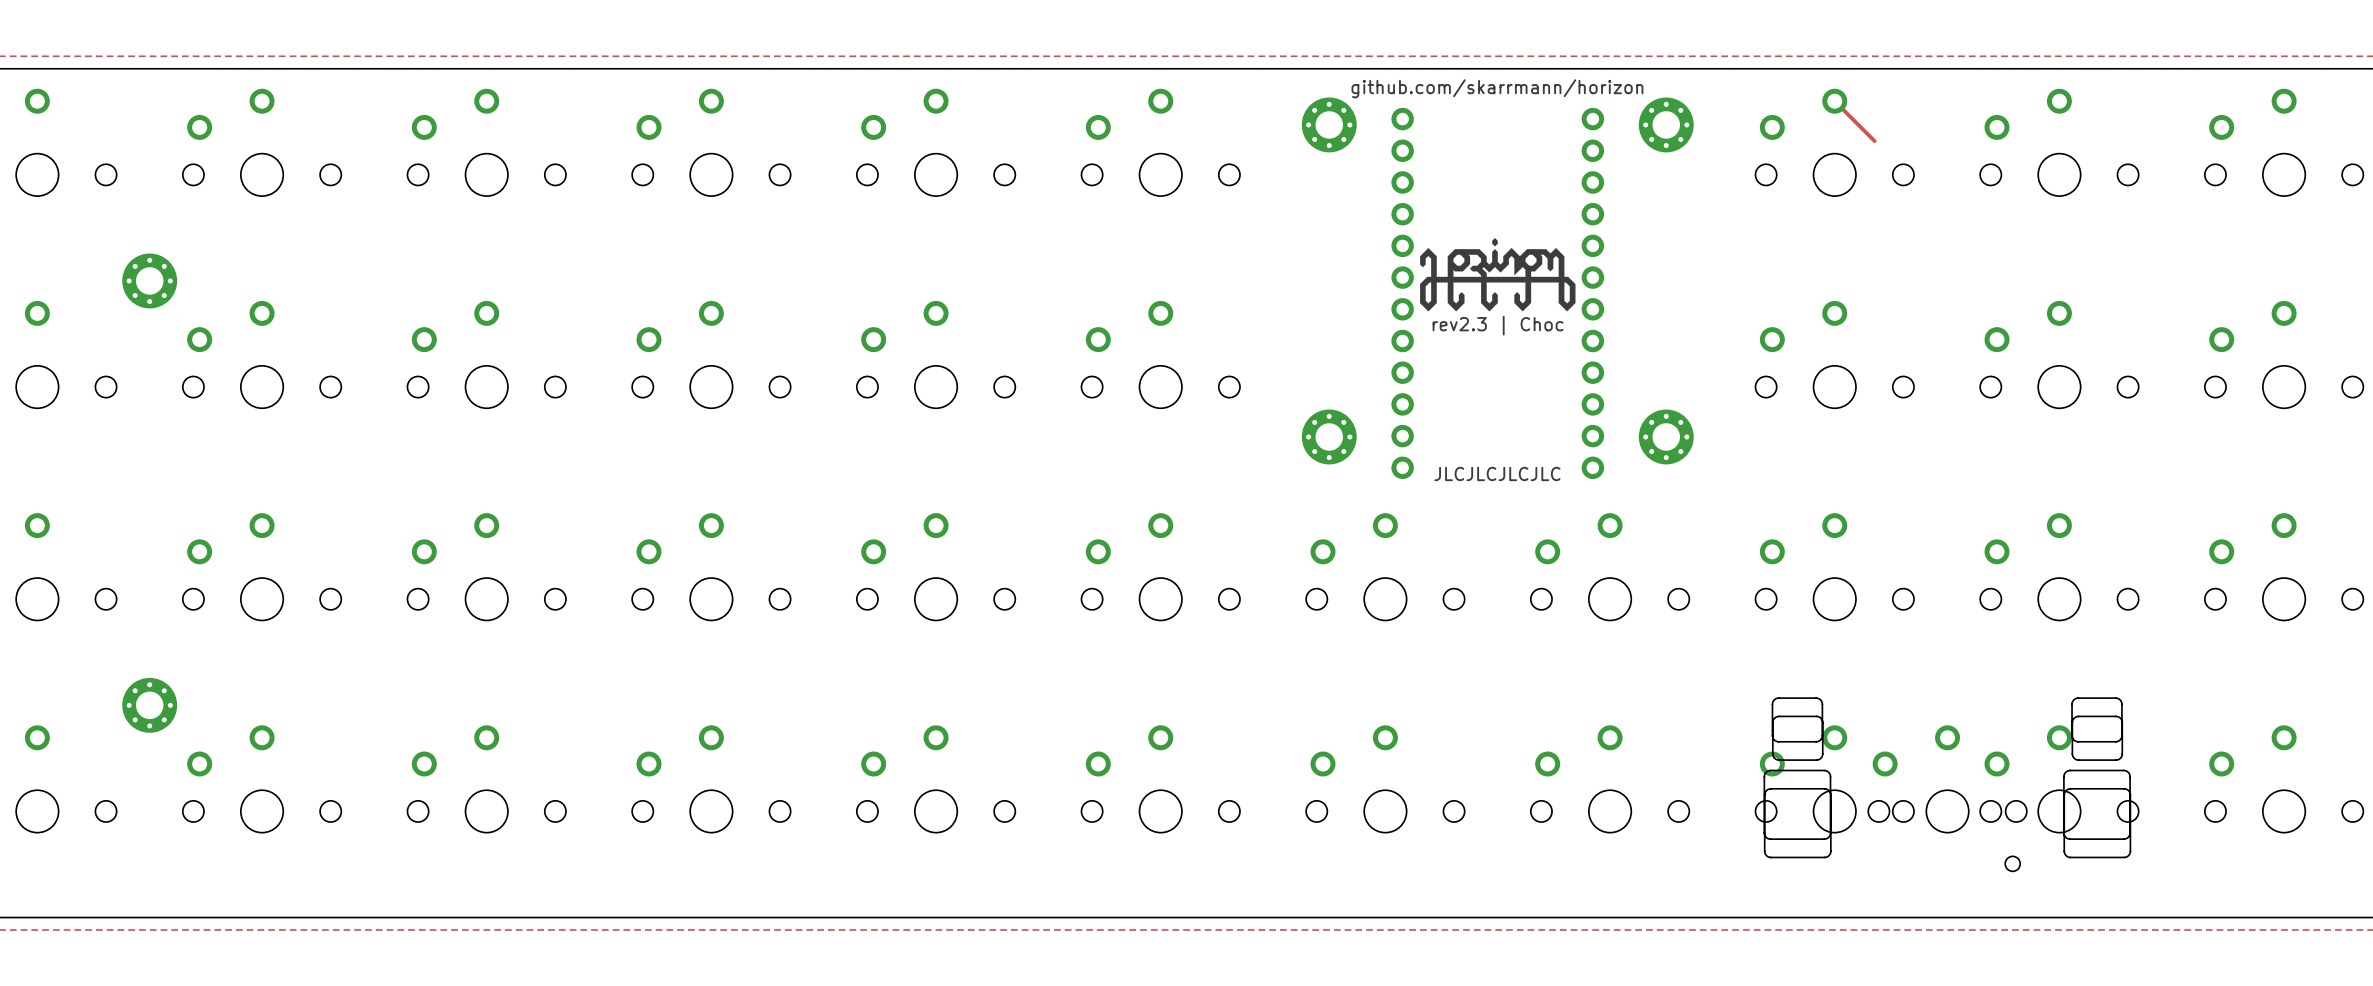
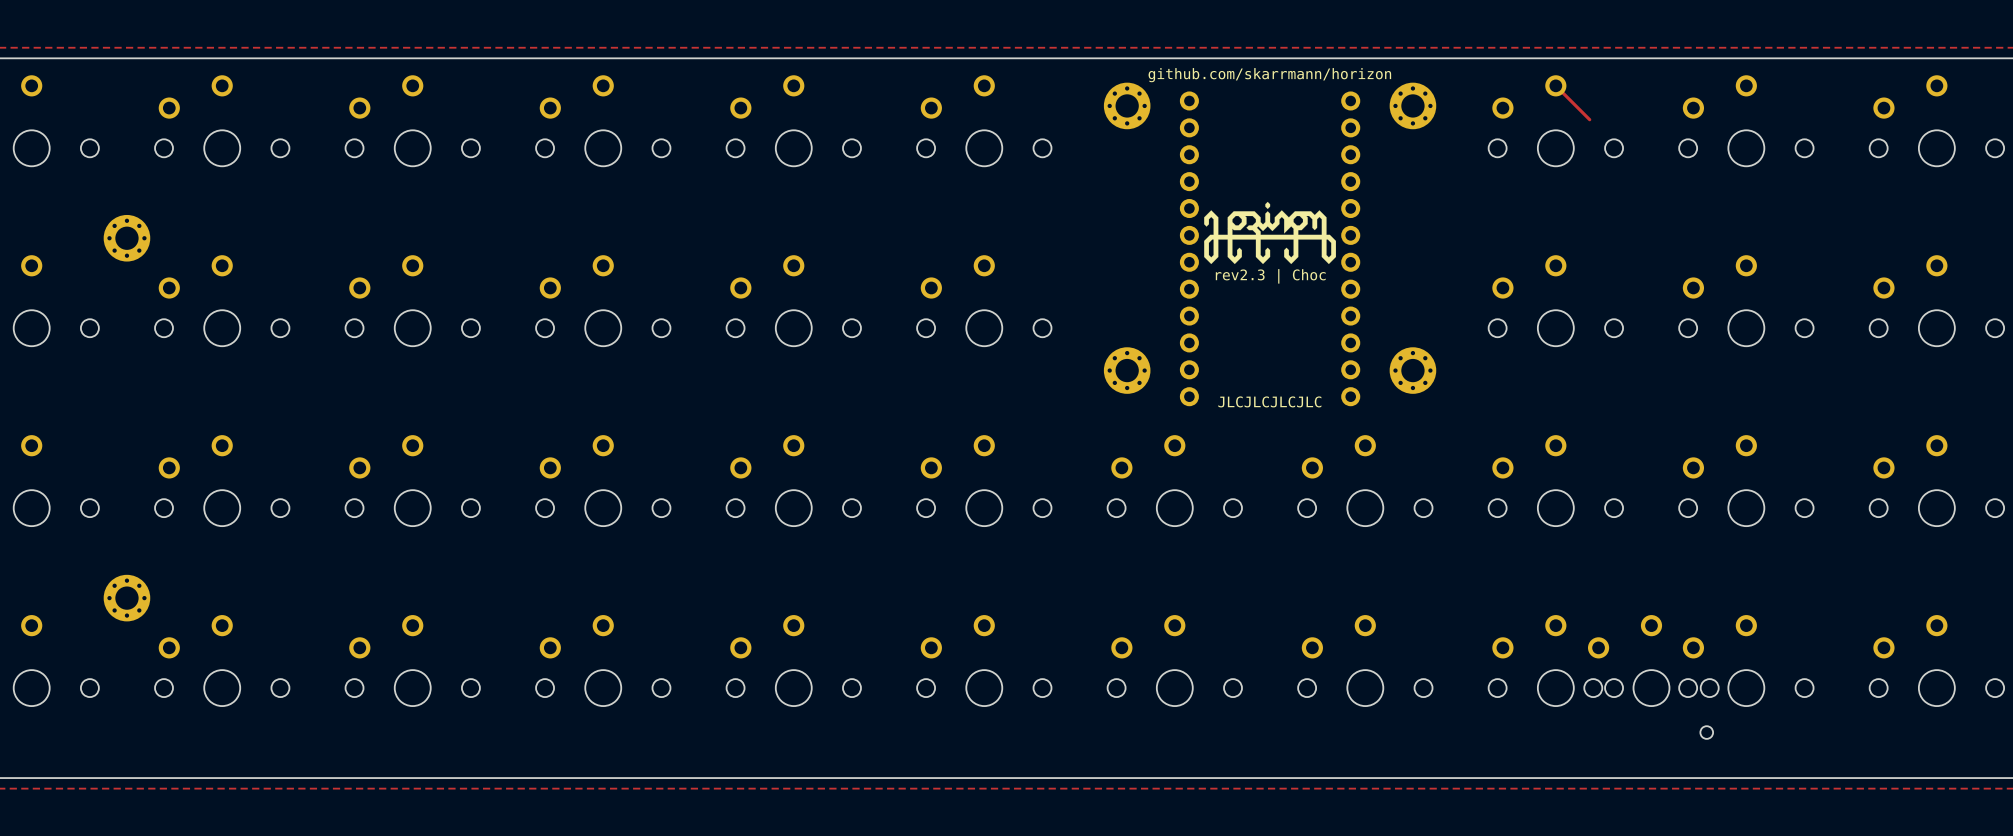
drawing: [1763, 697, 2132, 859] -> none

